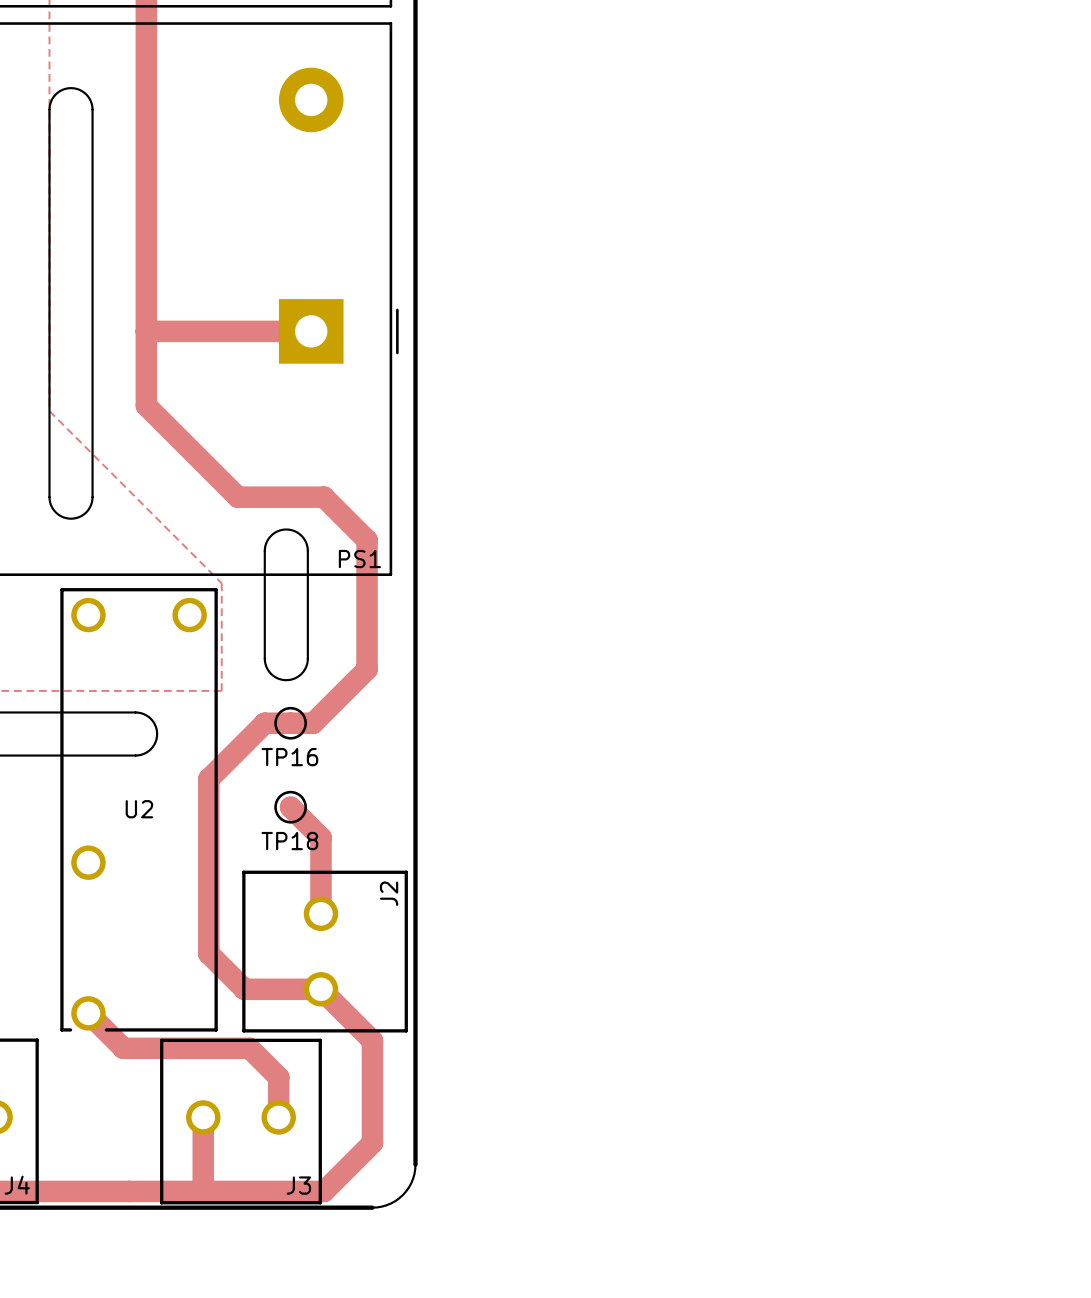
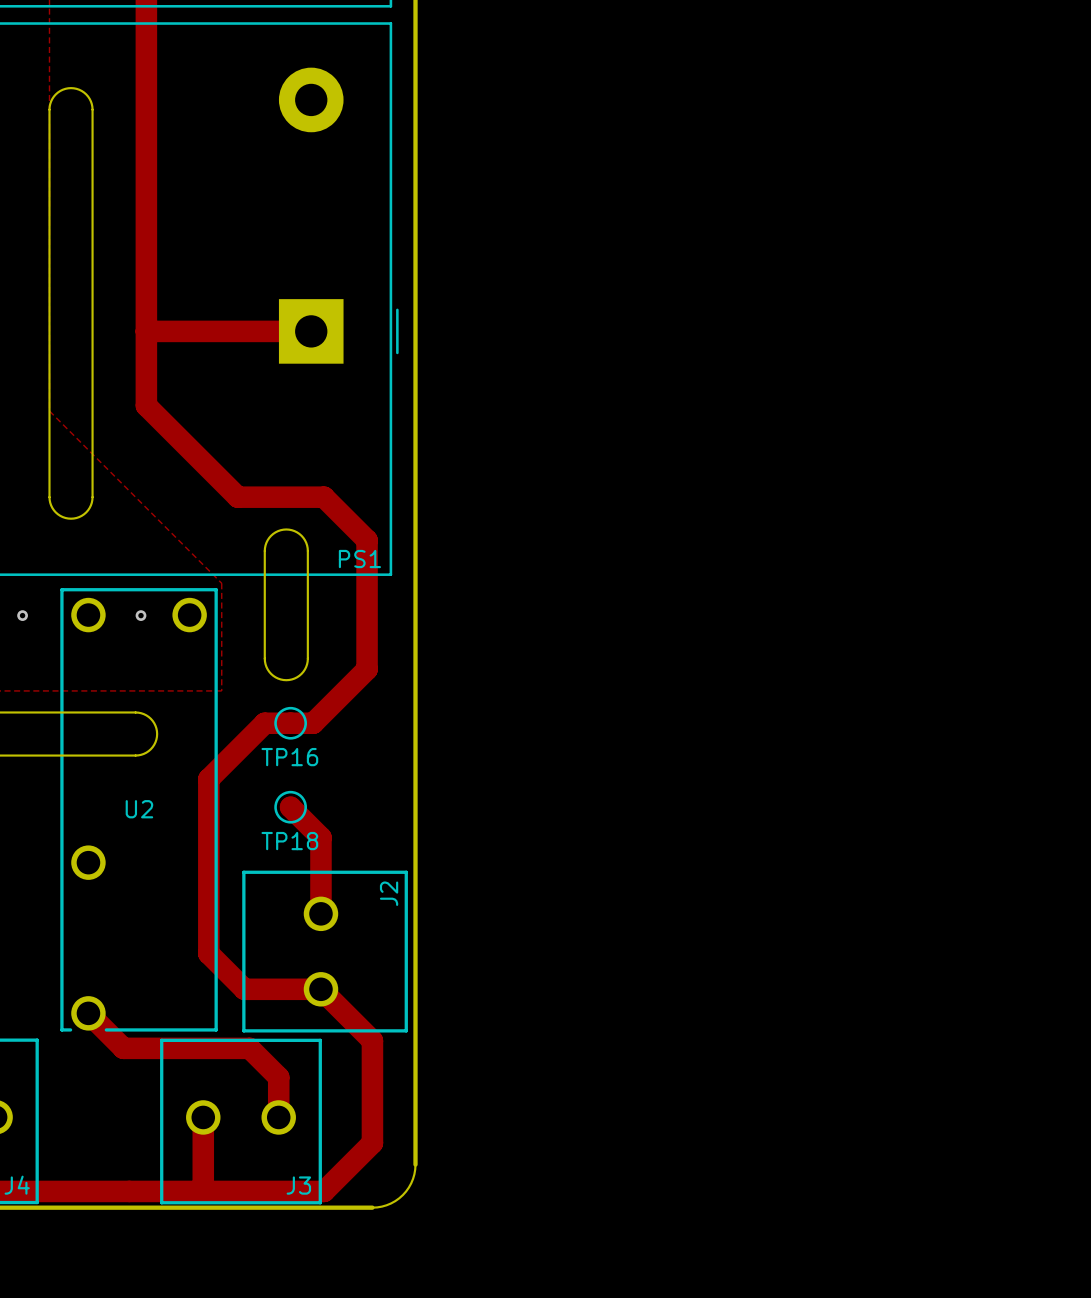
via: none -> (22, 615)
via: none -> (140, 615)

